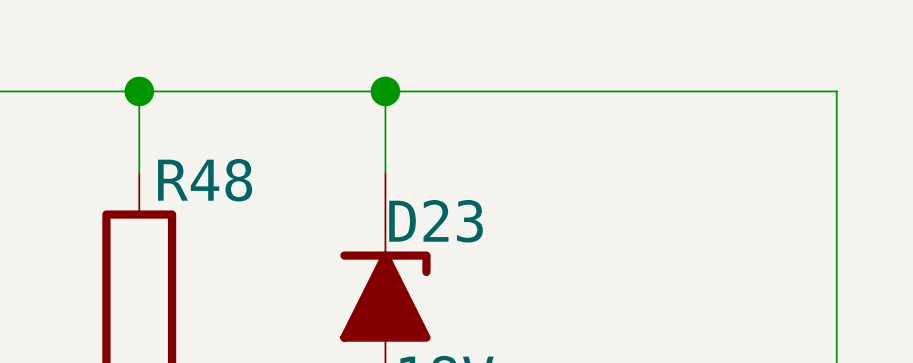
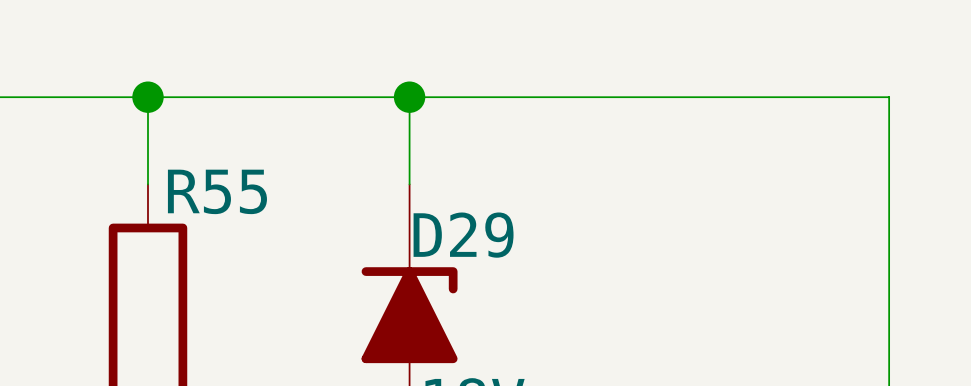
R48 name: R48 (205, 180) -> R55 (217, 191)
D23 name: D23 (436, 221) -> D29 (463, 235)

